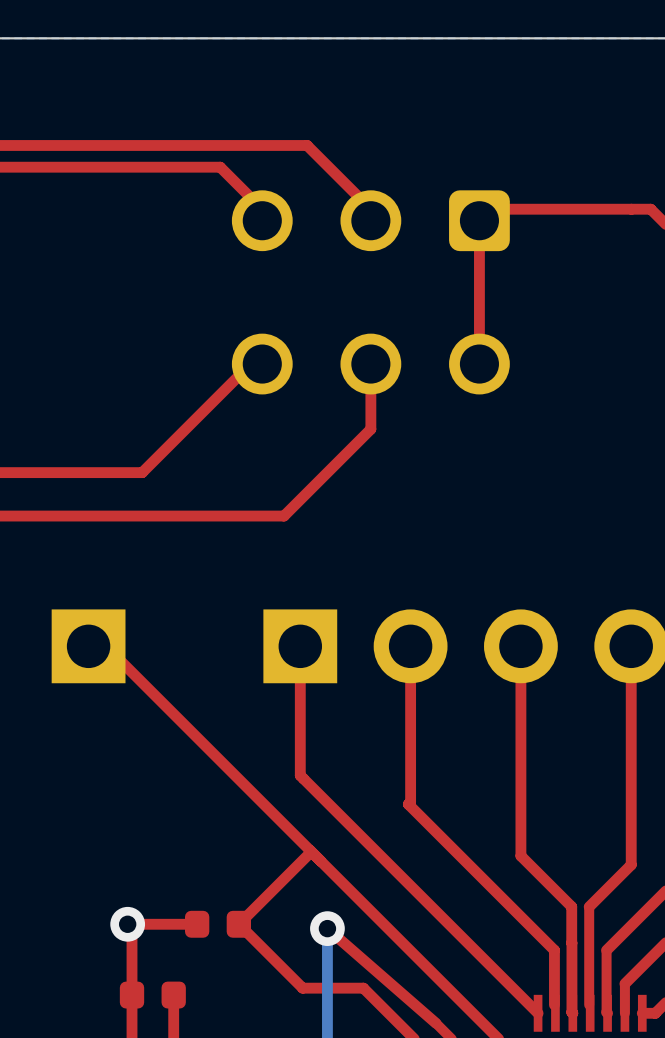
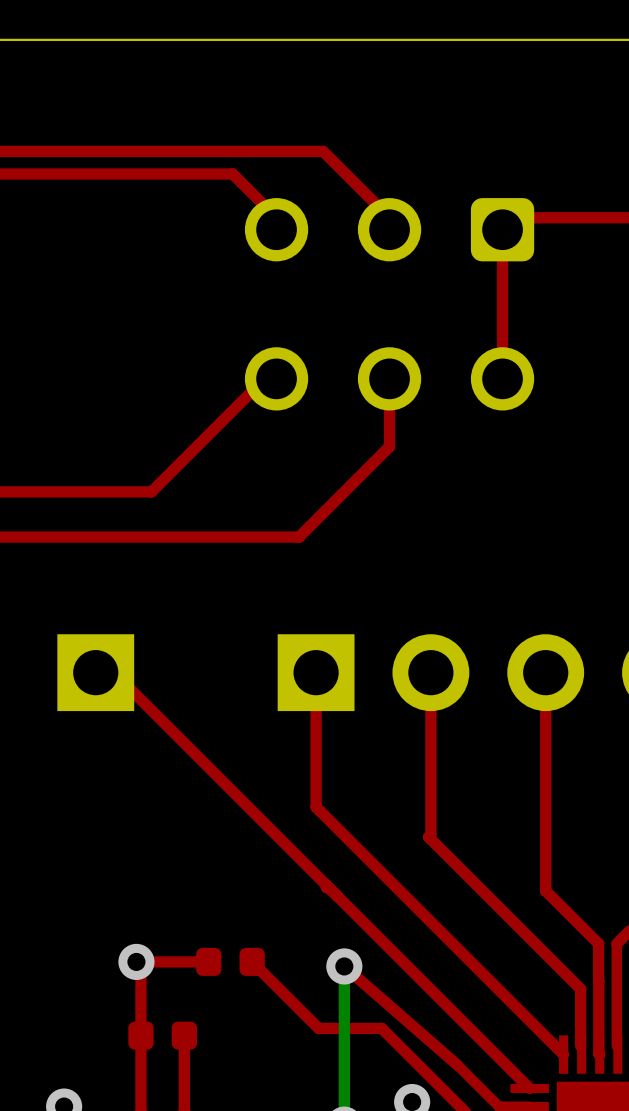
top track: (310, 853) (238, 924) -> none

